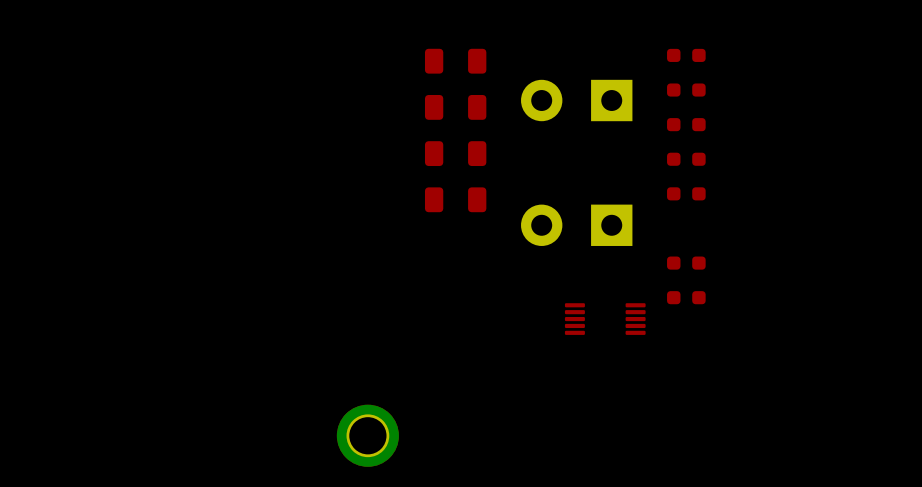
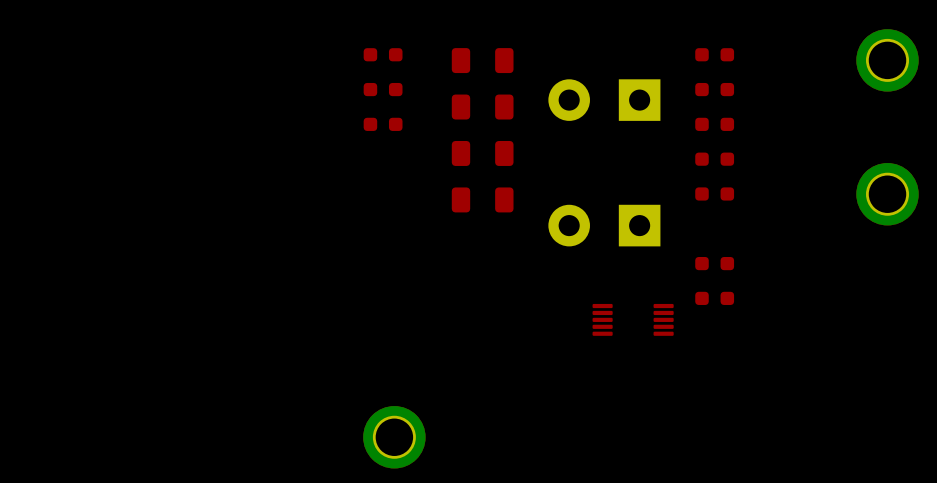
part: none -> (383, 54)
part: none -> (887, 60)
part: none -> (383, 89)
part: none -> (383, 124)
part: none -> (887, 194)

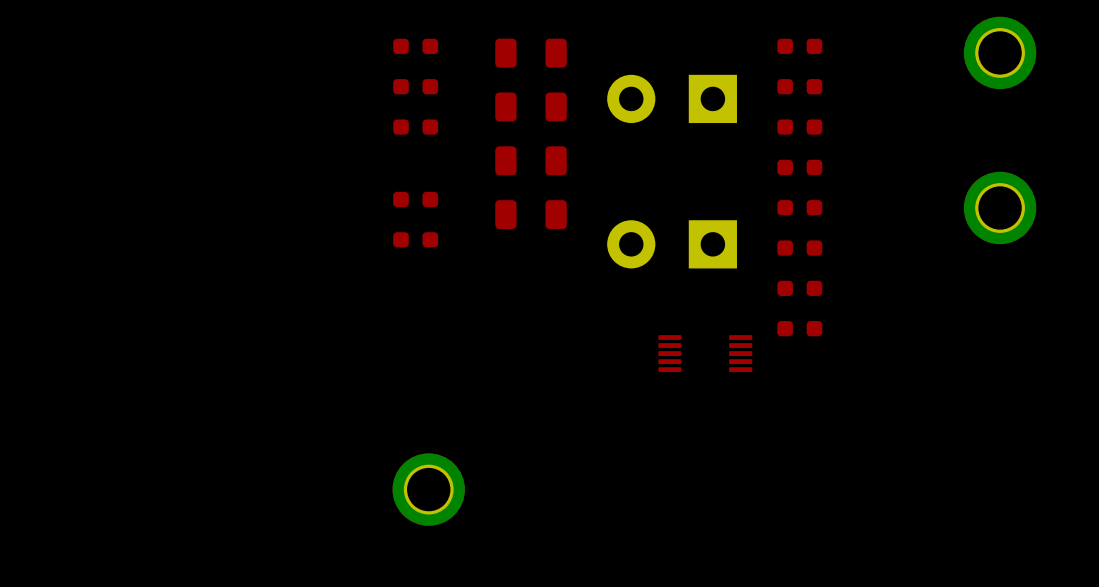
part: none -> (415, 199)
part: none -> (415, 239)
part: none -> (799, 248)

